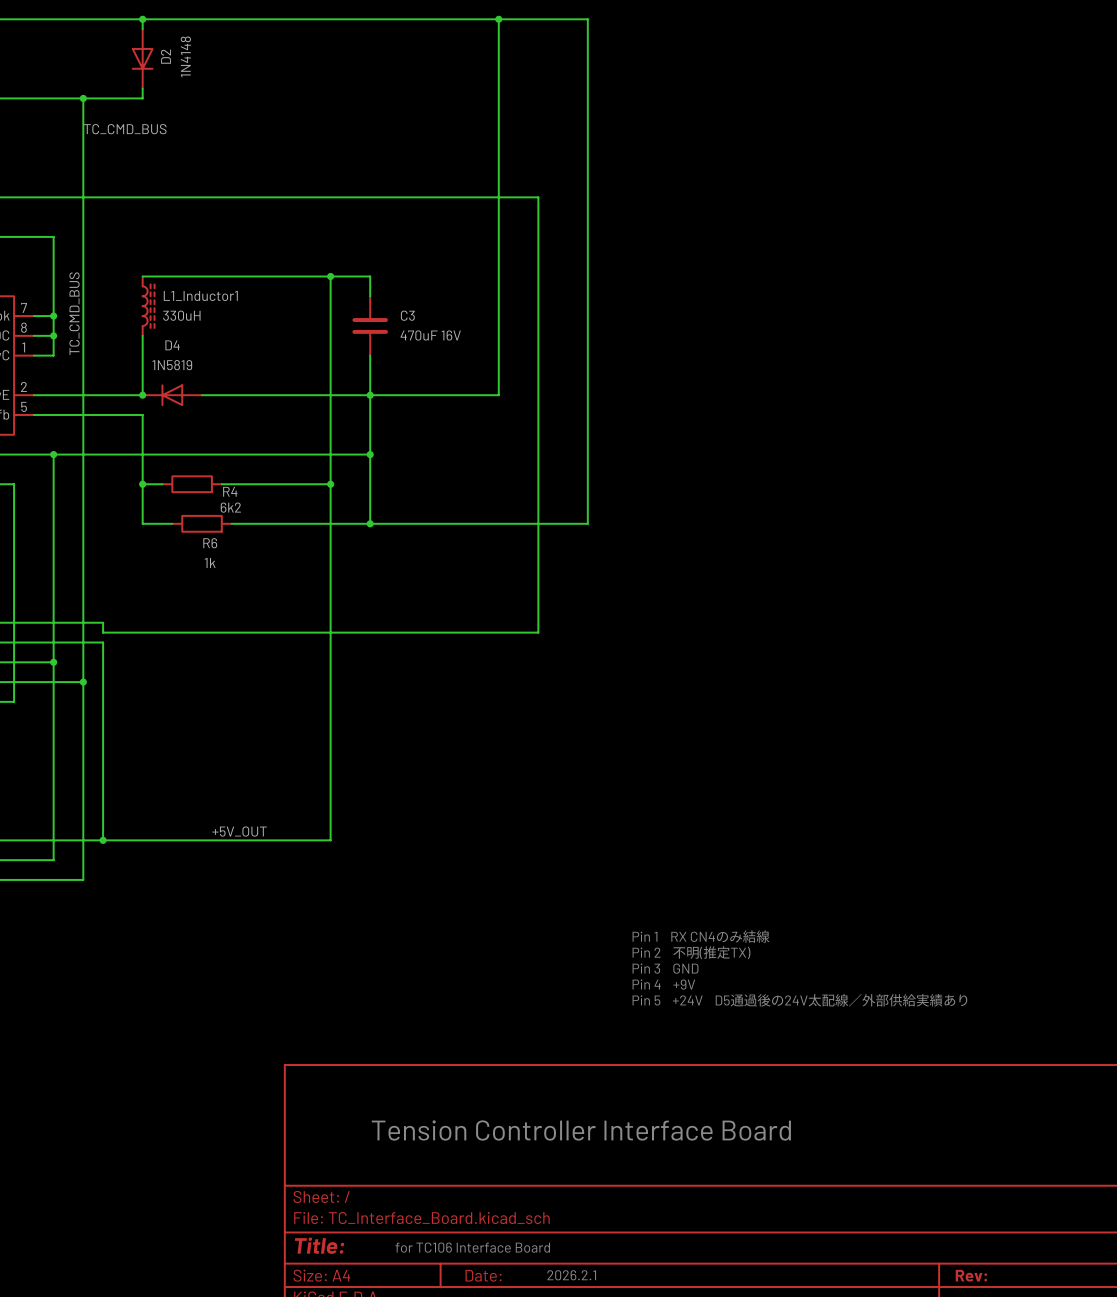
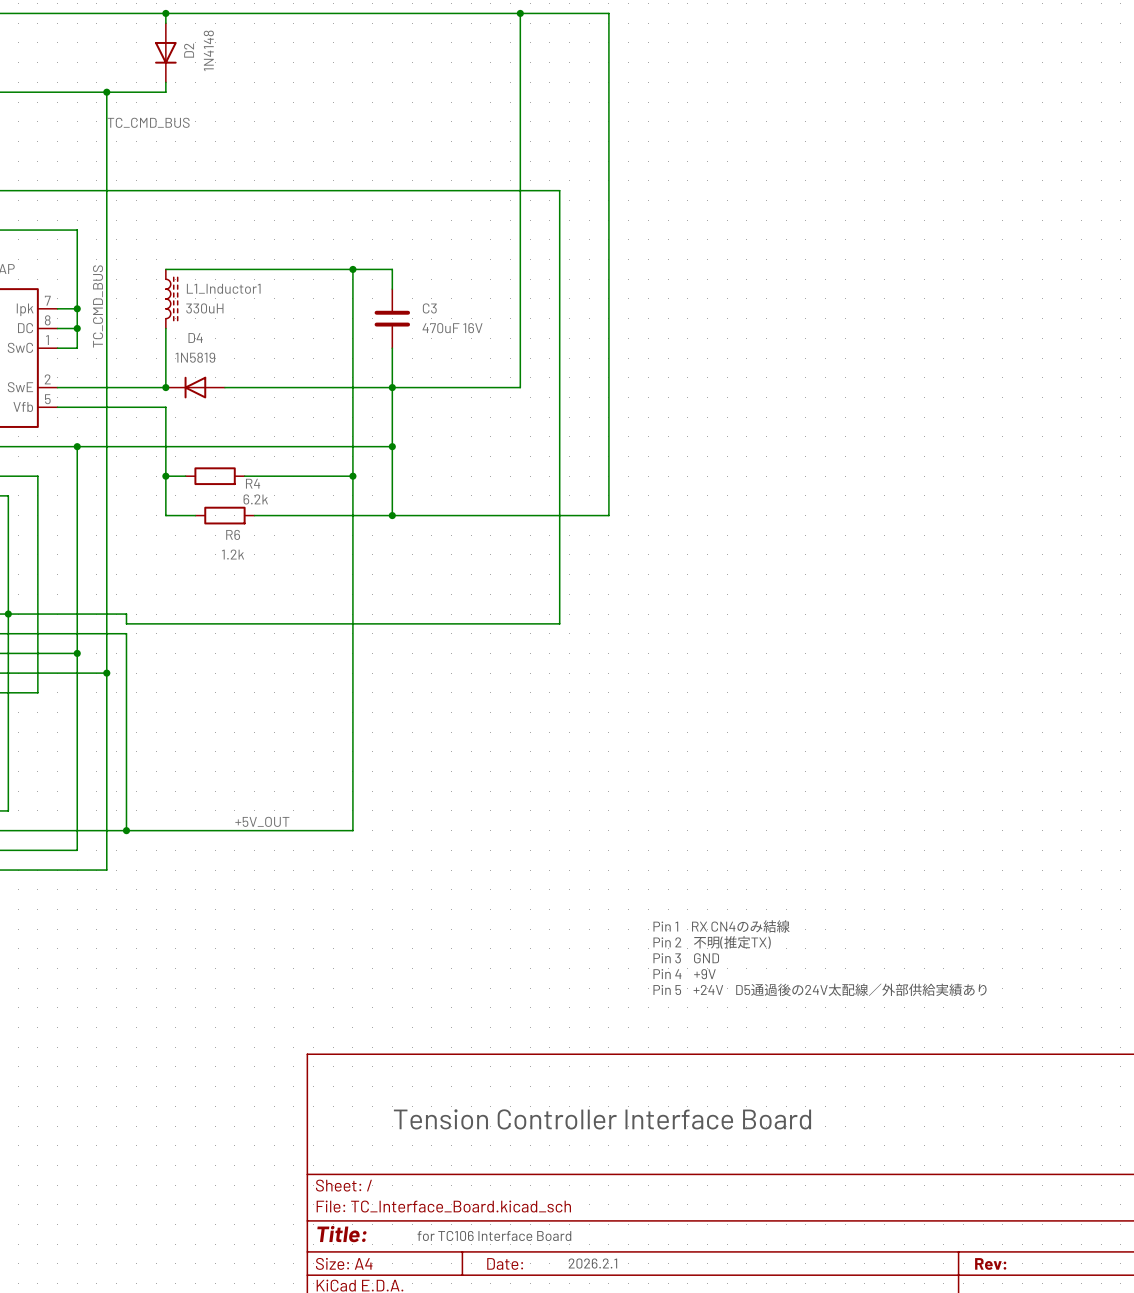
R4 value: 6k2 (230, 507) -> 6.2k (255, 499)
R6 value: 1k (210, 563) -> 1.2k (233, 554)

